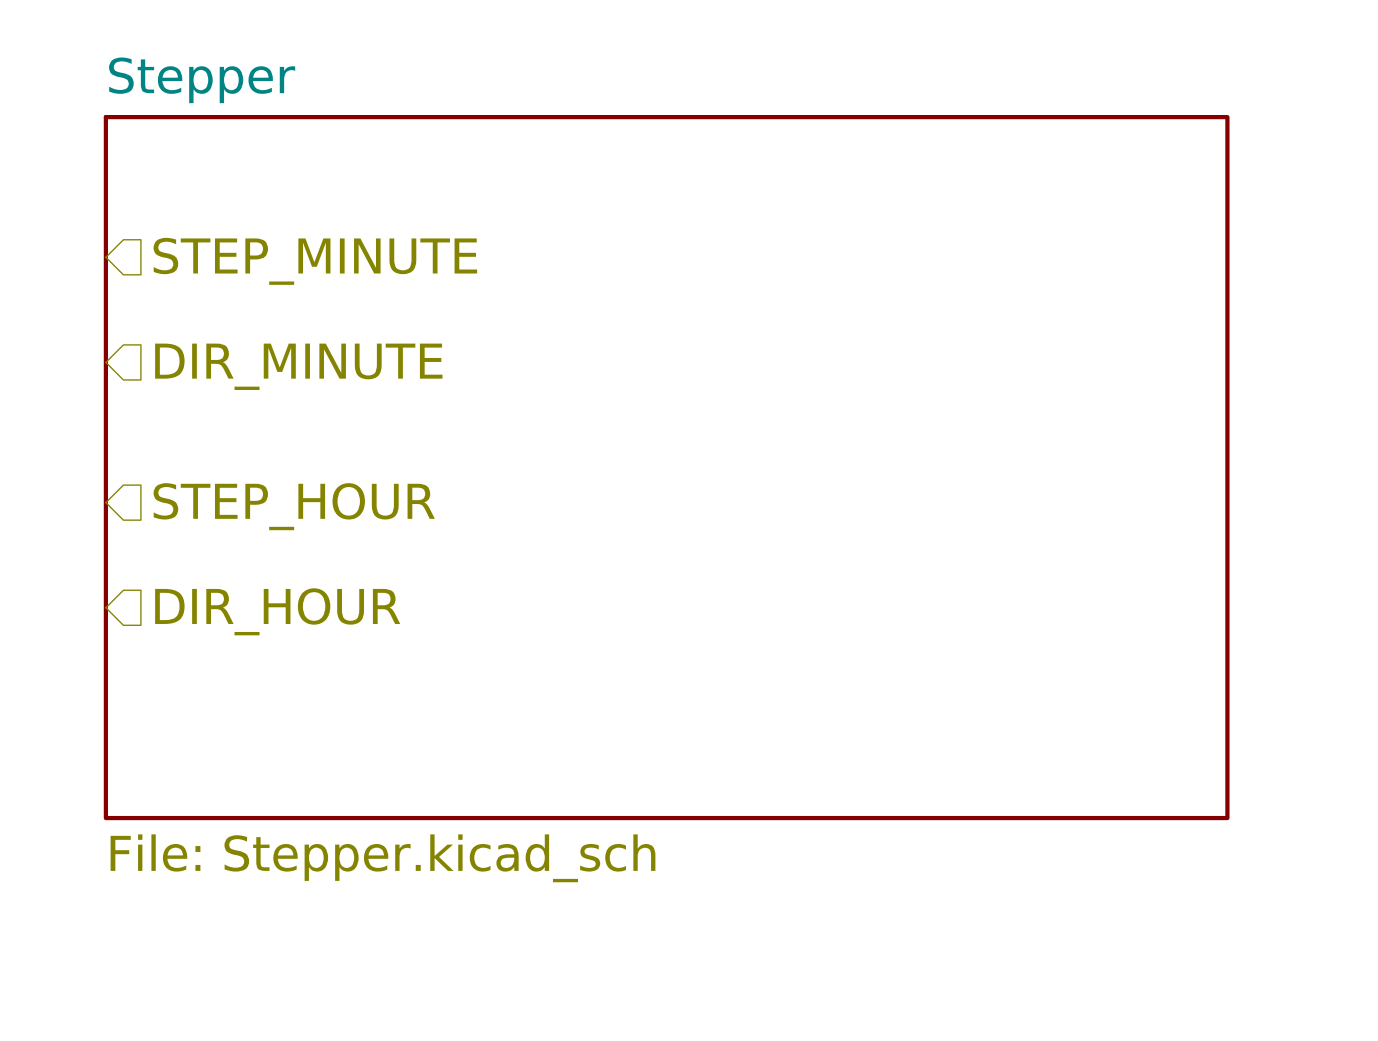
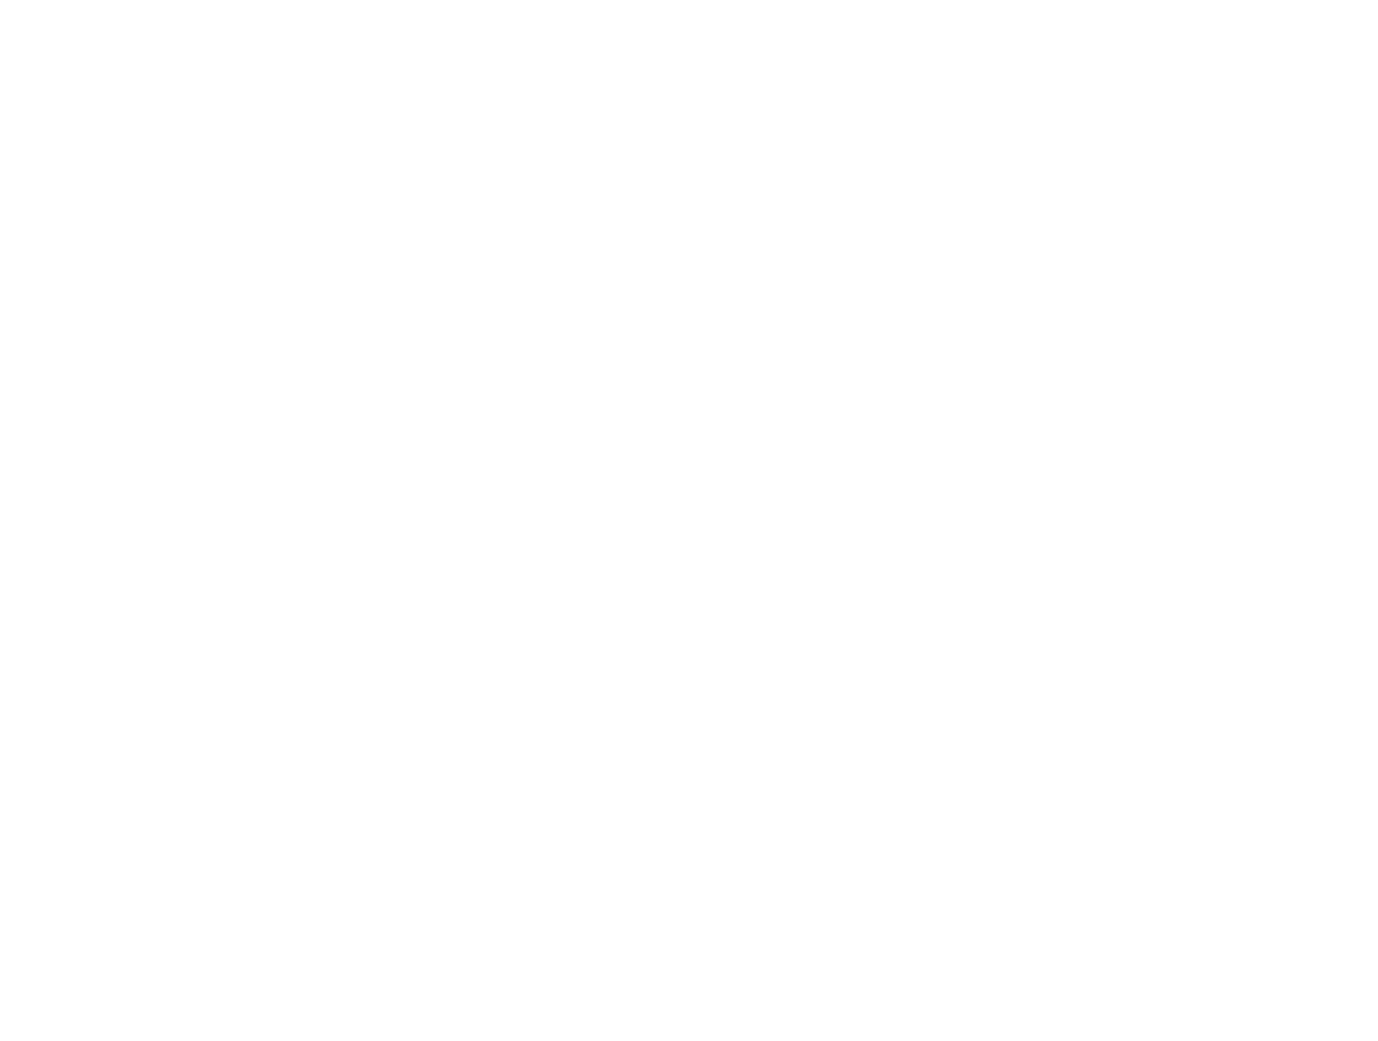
hierarchical label: STEP_MINUTE (315, 261) -> none
hierarchical label: DIR_MINUTE (298, 366) -> none
sheet Stepper: File: Stepper.kicad_sch (666, 467) -> none
hierarchical label: STEP_HOUR (294, 506) -> none
hierarchical label: DIR_HOUR (277, 611) -> none

